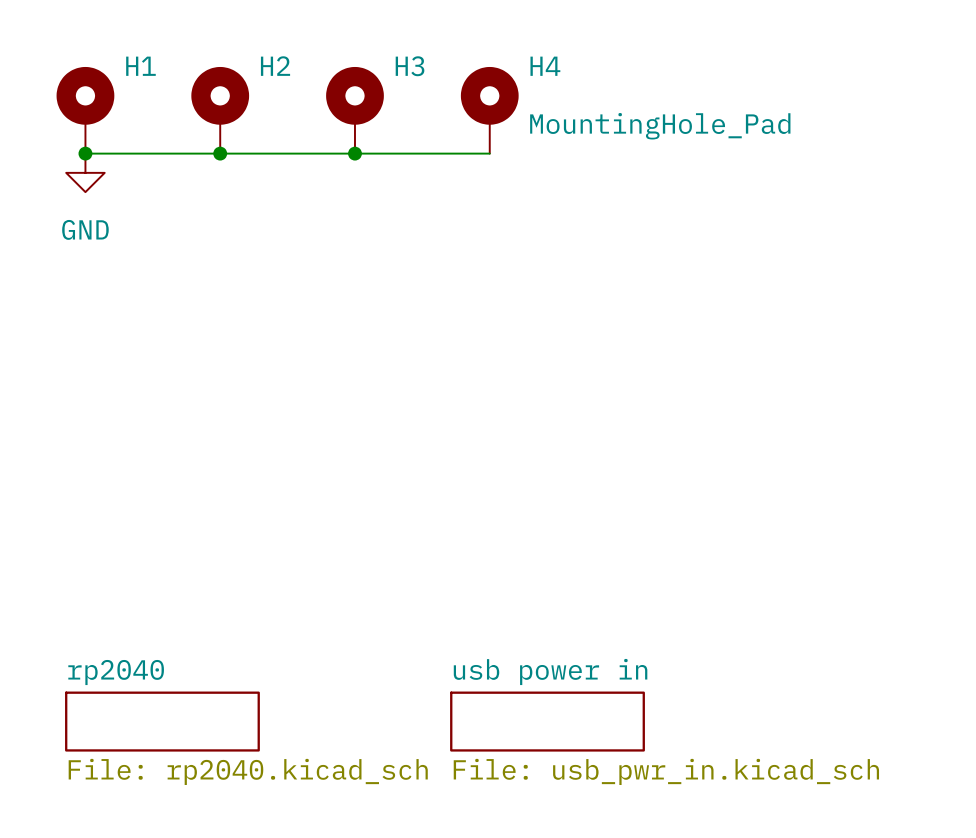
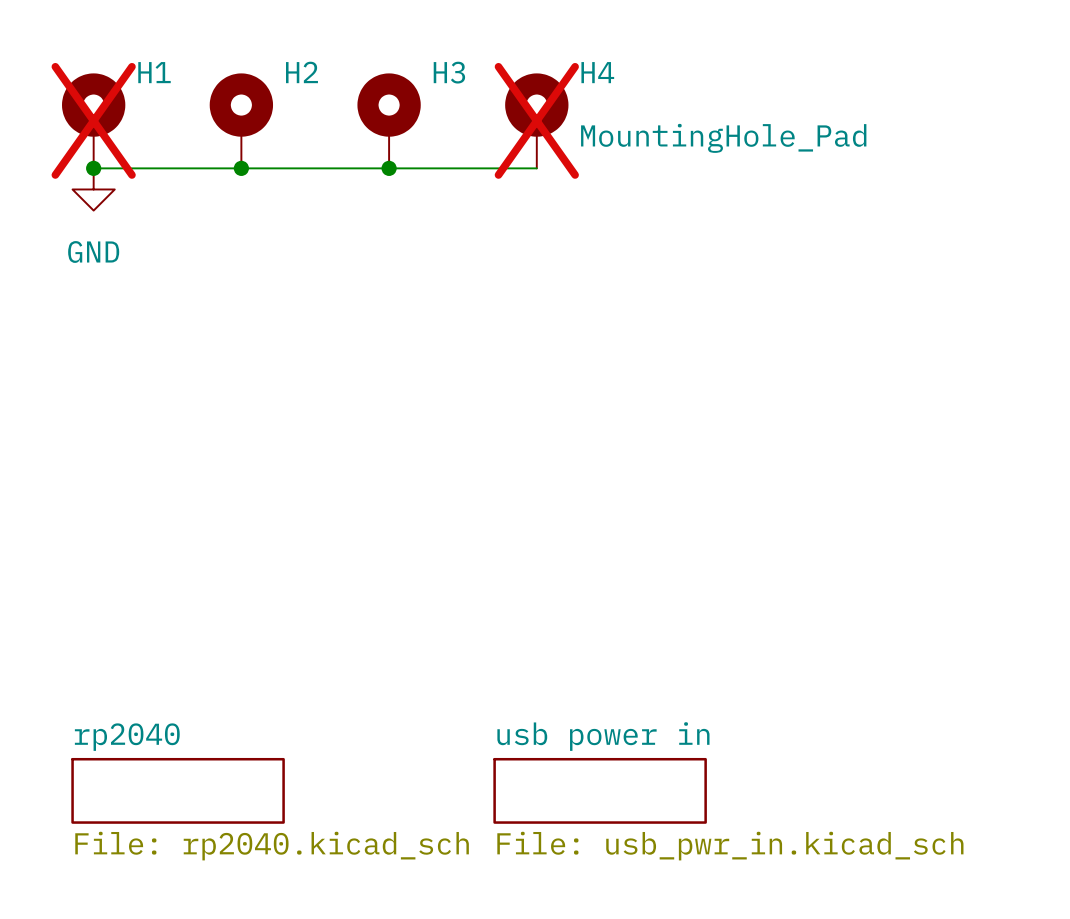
H1 do-not-place cross: none -> (93, 120)
H4 do-not-place cross: none -> (536, 120)

